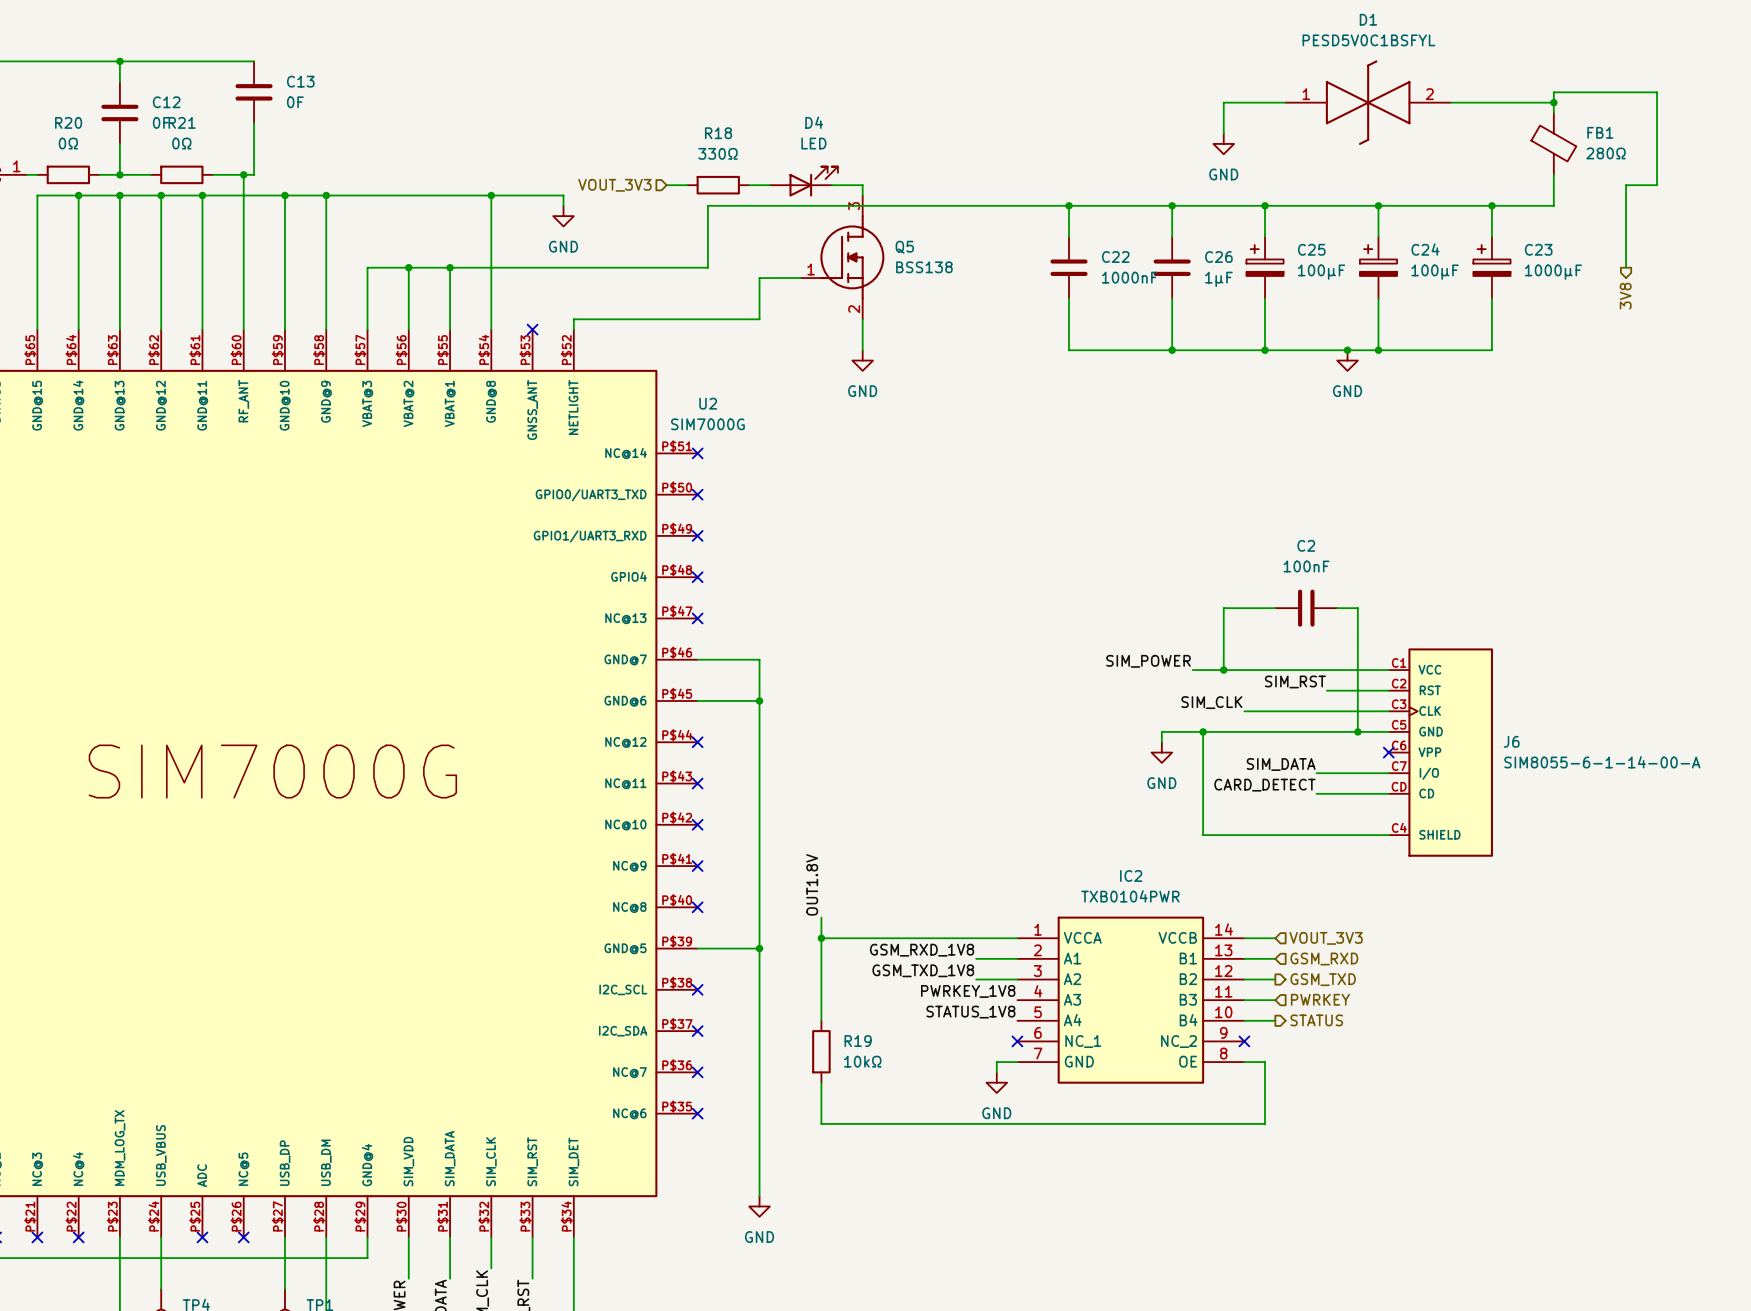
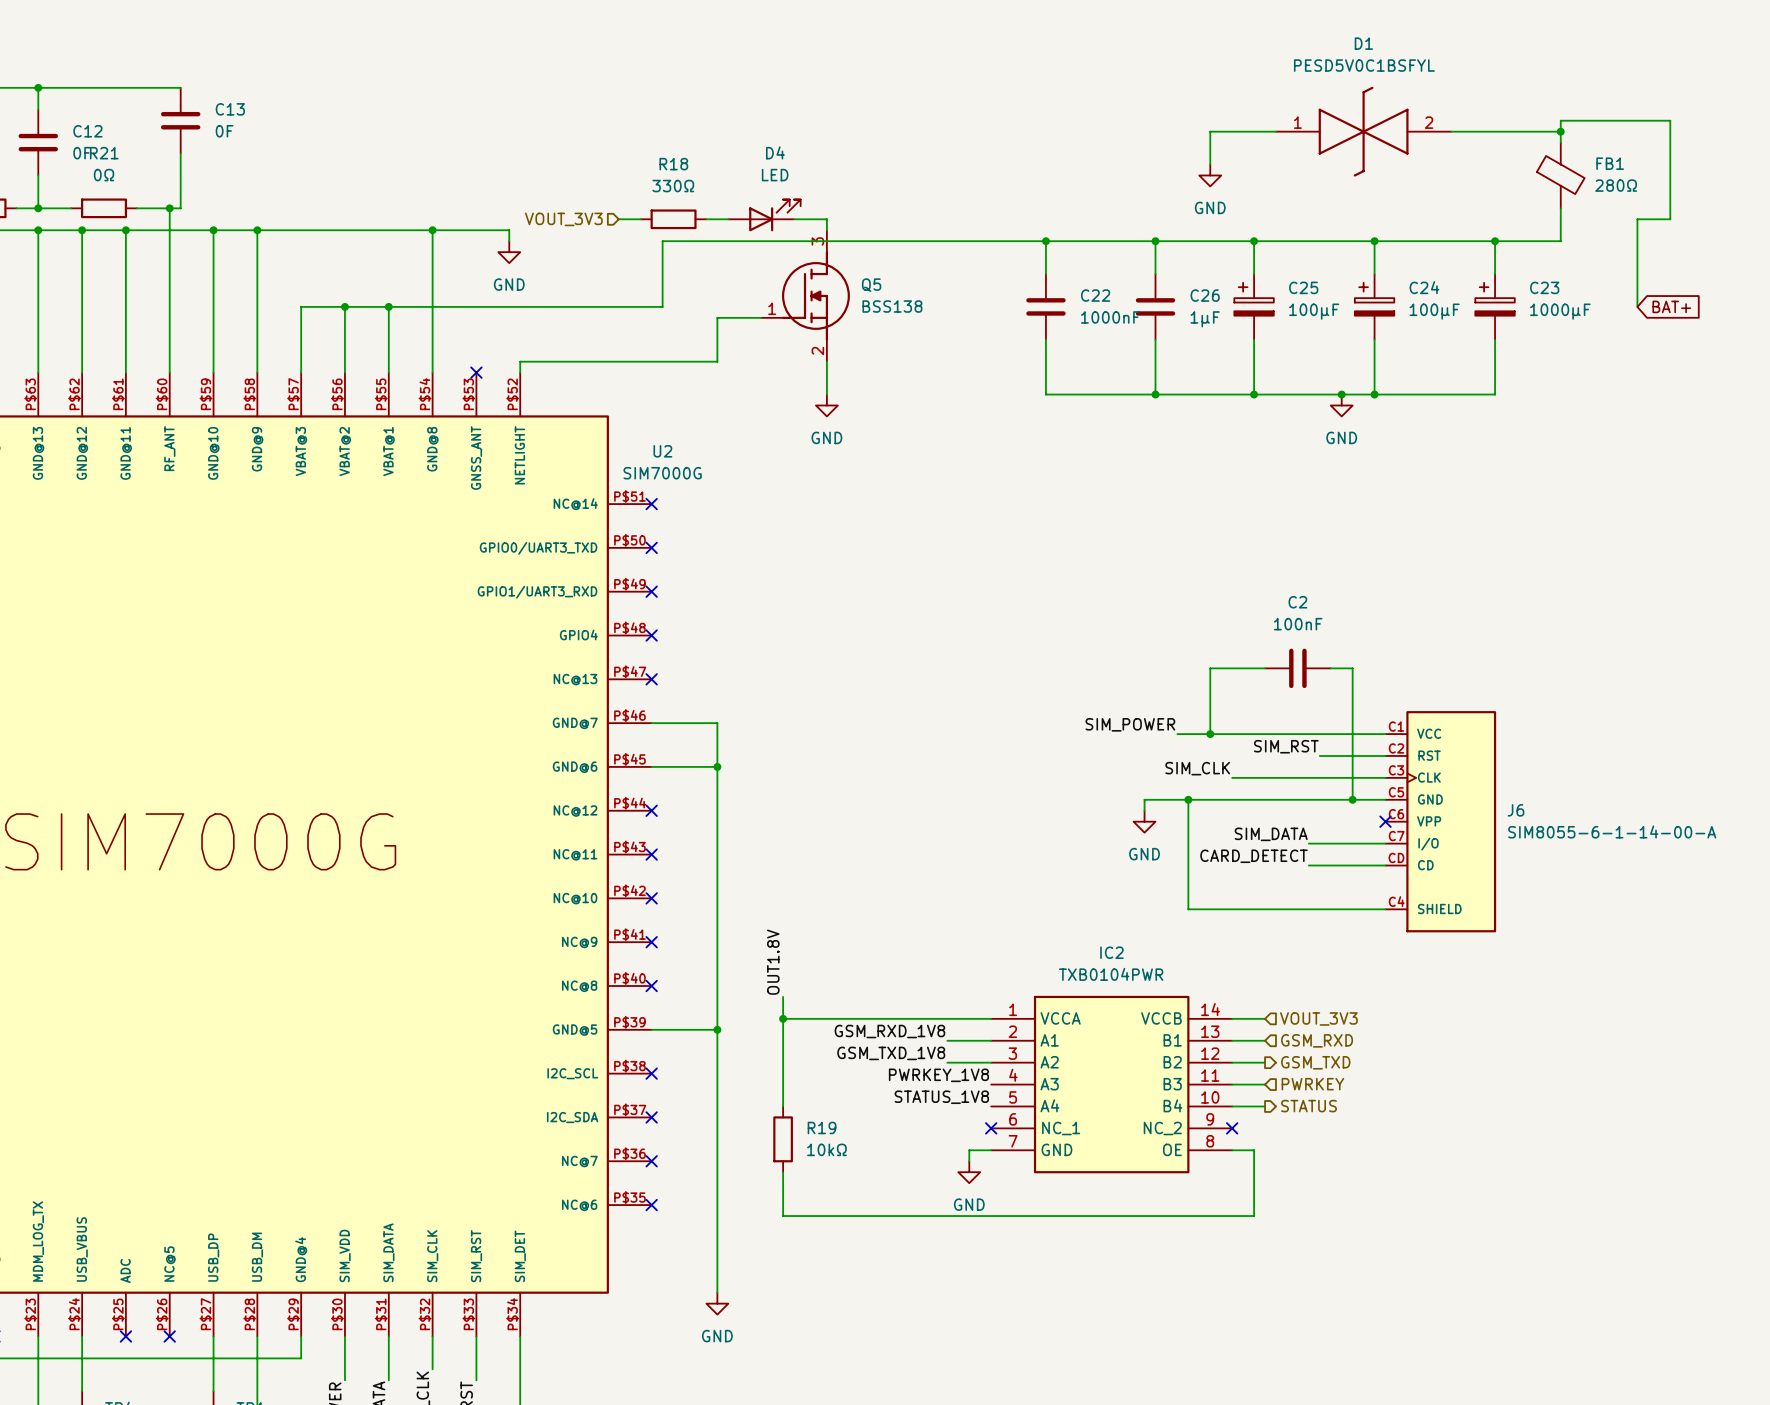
global label: none -> BAT+ (1671, 306)
hierarchical label: 3V8 (1625, 296) -> none

